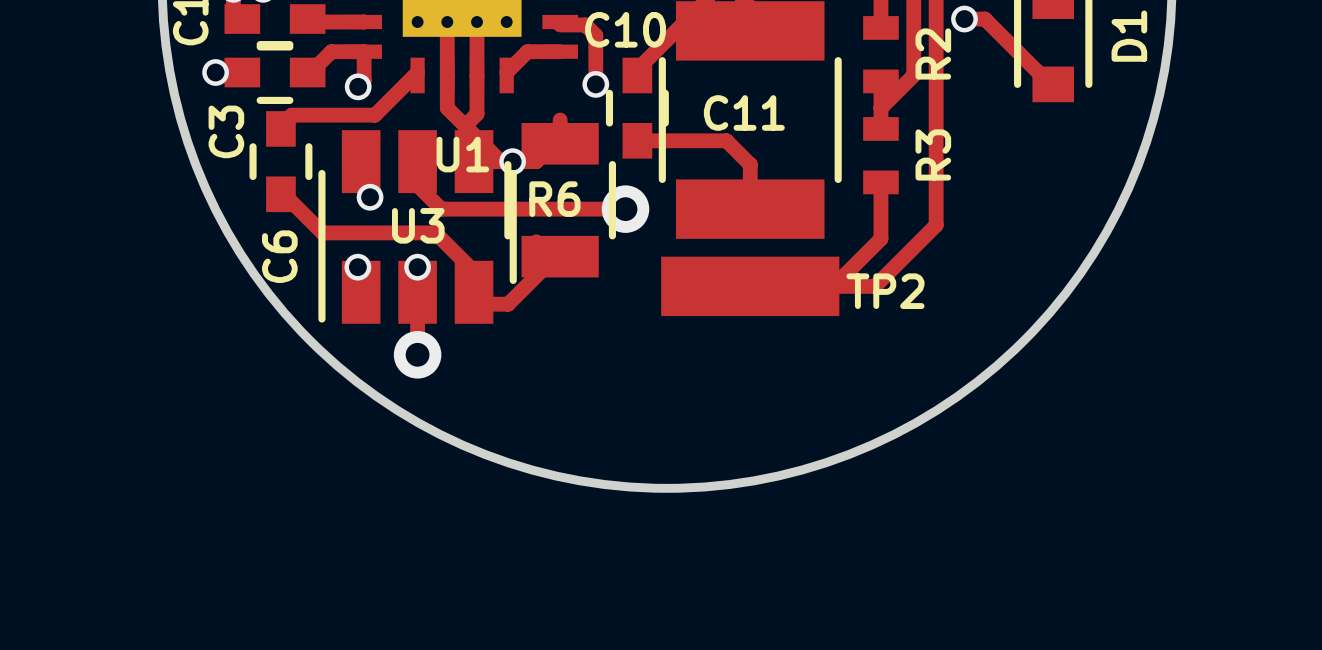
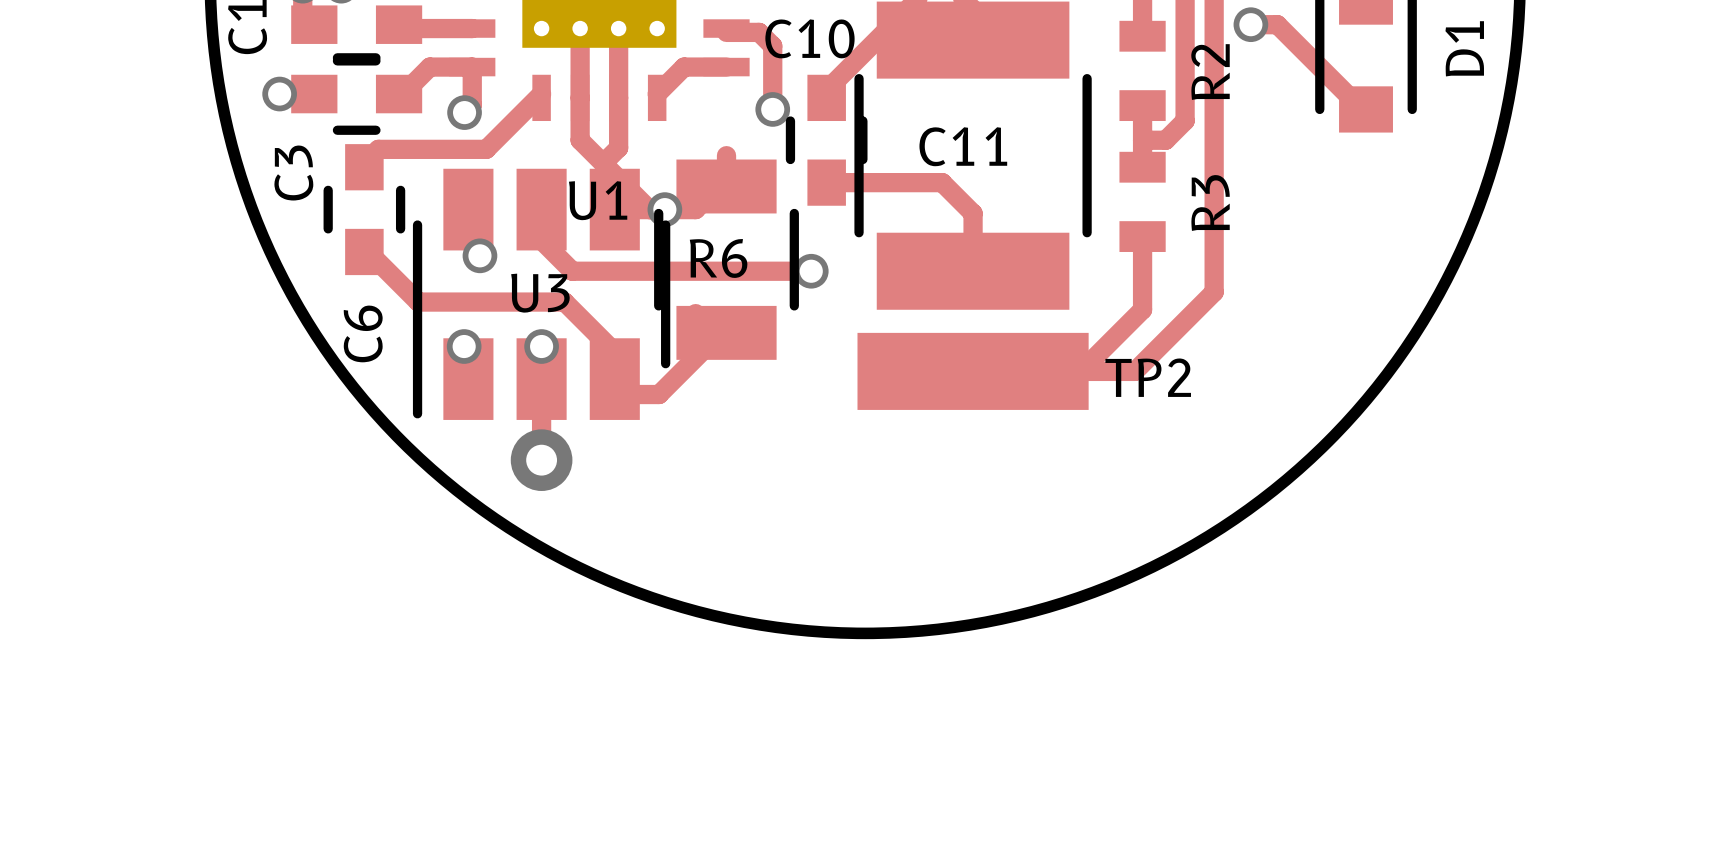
track: (913, 75) (880, 108) -> (1185, 97) (1185, 120) (1165, 140) (1142, 140)
via size: [601, 185, 650, 233] -> [793, 253, 829, 289]

